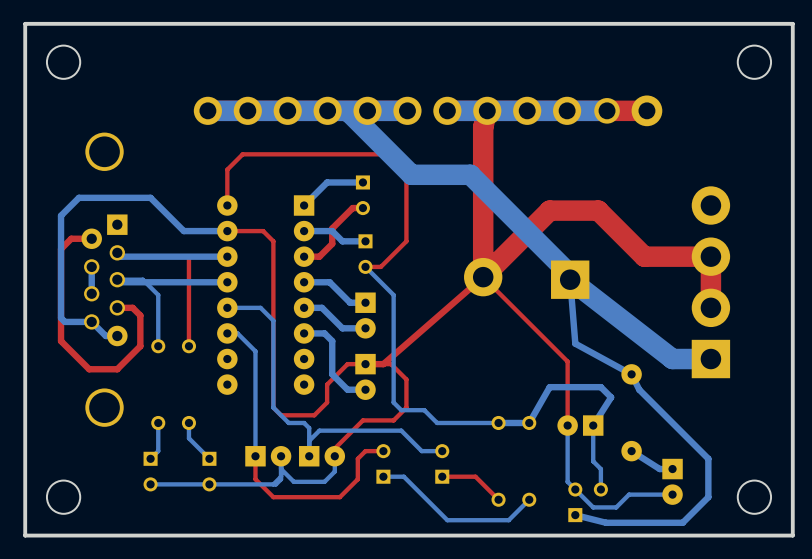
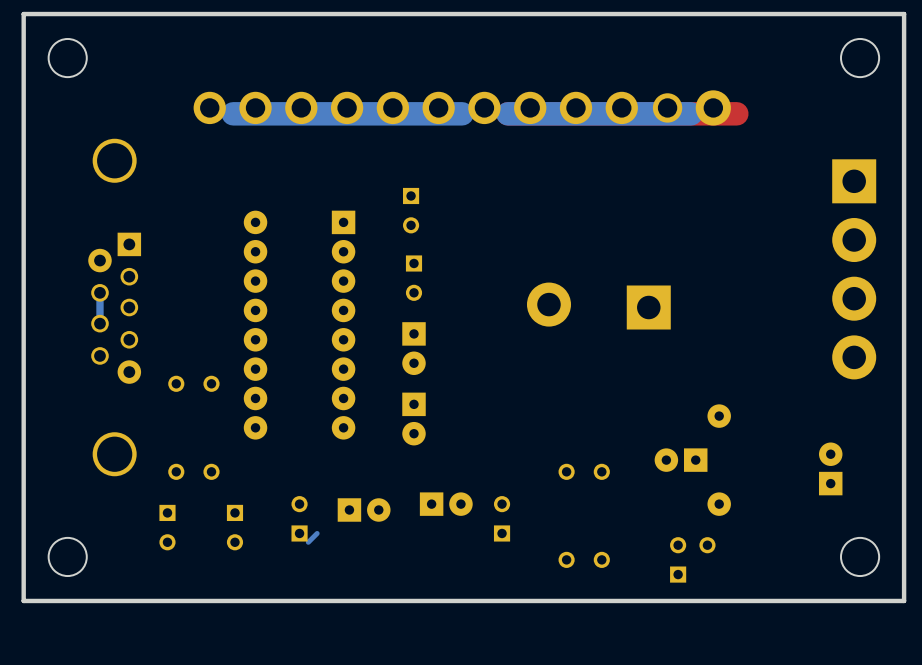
bottom track: (367, 110) (350, 113) (411, 174) (470, 174) (570, 274) (570, 279) -> none
part position: (428, 110) -> (462, 107)
top track: (487, 110) (483, 127) (483, 277) -> none
bottom track: (362, 182) (327, 182) (304, 205) -> none
top track: (227, 205) (227, 169) (242, 154) (383, 154) (406, 177) (406, 241) (380, 266) (365, 266) -> none
top track: (362, 208) (352, 208) (332, 228) (332, 243) (319, 256) (304, 256) -> none
bottom track: (227, 231) (183, 231) (150, 197) (78, 197) (61, 215) (61, 318) (64, 321) (91, 321) (105, 335) (117, 335) -> none
top track: (227, 231) (263, 231) (273, 241) (273, 407) (281, 415) (314, 415) (327, 402) (327, 384) (347, 364) (391, 364) (406, 379) (406, 407) (393, 420) (362, 420) (334, 448) (334, 456) -> none
bottom track: (304, 231) (332, 231) (342, 241) (365, 241) -> none
top track: (91, 238) (71, 238) (61, 249) (61, 341) (89, 369) (117, 369) (140, 346) (140, 315) (132, 307) (117, 307) -> none
bottom track: (117, 252) (121, 256) (227, 256) -> none
top track: (227, 256) (188, 256) (188, 346) -> none
bottom track: (365, 266) (393, 295) (393, 402) (401, 410) (424, 410) (437, 422) (529, 422) (549, 387) (600, 387) (611, 397) (593, 425) (593, 461) (600, 469) (600, 489) -> none
top track: (483, 277) (383, 364) (365, 364) -> none
top track: (483, 277) (549, 210) (598, 210) (644, 256) (710, 256) (710, 307) -> none
top track: (483, 277) (567, 361) (567, 425) -> none
bottom track: (570, 279) (575, 343) (631, 374) (639, 389) (708, 458) (708, 497) (682, 522) (606, 522) (575, 515) -> none
bottom track: (570, 279) (672, 359) (710, 359) -> none
bottom track: (227, 282) (119, 282) (117, 279) (142, 279) (158, 295) (158, 346) -> none
bottom track: (304, 282) (329, 282) (350, 302) (365, 302) -> none
part rotation: 0° (710, 282) -> 180° (854, 269)
bottom track: (227, 307) (260, 307) (273, 320) (273, 407) (288, 422) (304, 422) (309, 428) (309, 456) -> none
bottom track: (304, 307) (322, 307) (342, 328) (365, 328) -> none
bottom track: (227, 333) (237, 333) (255, 351) (255, 456) -> none
bottom track: (304, 333) (324, 333) (332, 341) (332, 374) (347, 389) (365, 389) -> none
part: none -> (830, 468)
bottom track: (158, 422) (158, 451) (150, 458) -> none
bottom track: (188, 422) (188, 438) (209, 458) -> none
bottom track: (567, 425) (567, 481) (593, 507) (616, 507) (629, 494) (672, 494) -> none
part position: (580, 425) -> (681, 460)
bottom track: (309, 440) (319, 430) (401, 430) (421, 451) (442, 451) -> none
part footprint: [245, 446, 292, 467] -> [291, 496, 308, 542]
top track: (383, 451) (365, 451) (357, 458) (357, 479) (339, 497) (273, 497) (255, 479) (255, 456) -> none
part: none -> (446, 504)
bottom track: (631, 451) (659, 469) (672, 469) -> none
bottom track: (281, 456) (281, 479) (275, 484) (150, 484) -> none
bottom track: (334, 456) (334, 471) (324, 481) (293, 481) (281, 469) -> none
part: (383, 463) -> none
bottom track: (383, 476) (403, 476) (447, 520) (508, 520) (529, 499) -> none
top track: (442, 476) (475, 476) (498, 499) -> none
part: (672, 481) -> none
part position: (588, 502) -> (692, 559)

